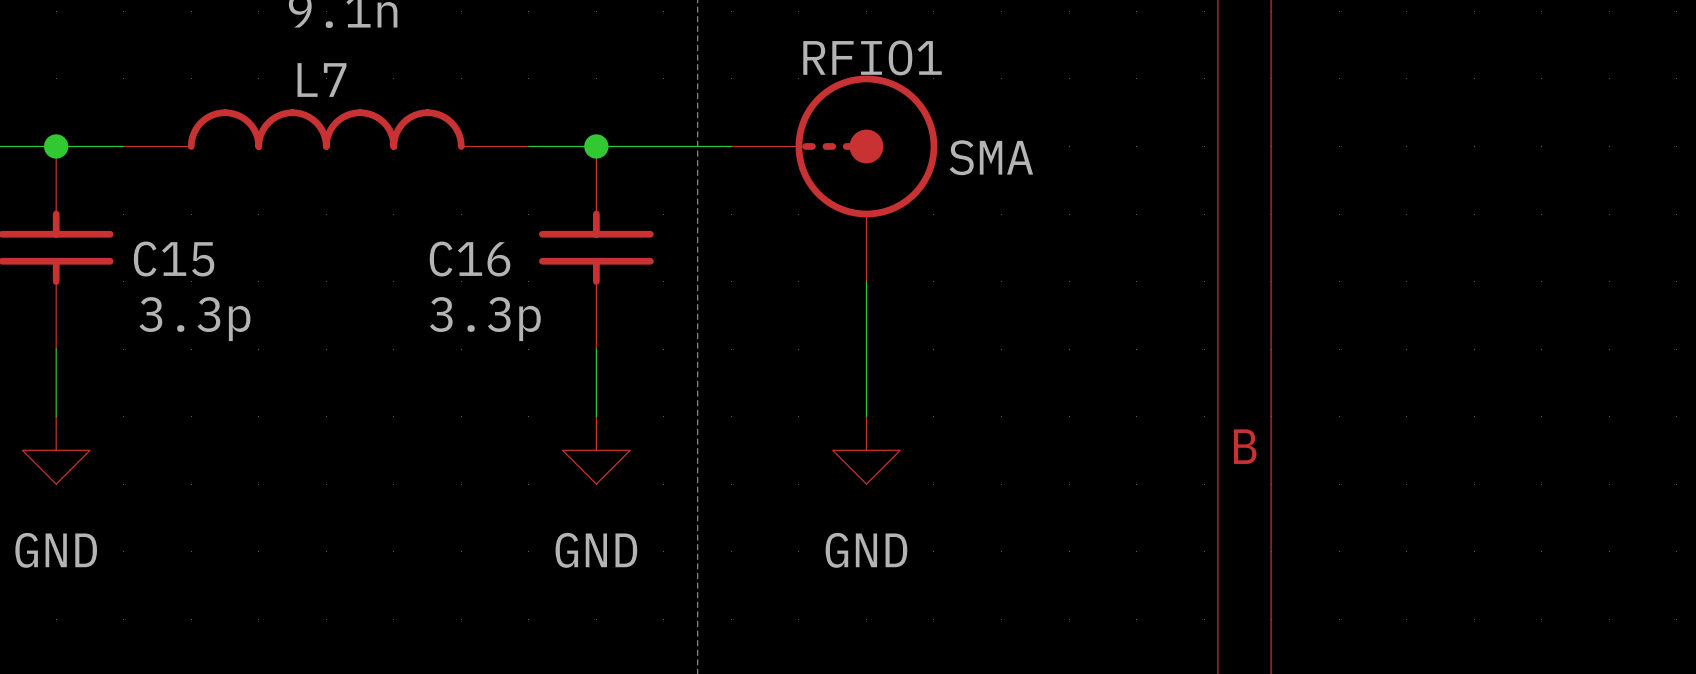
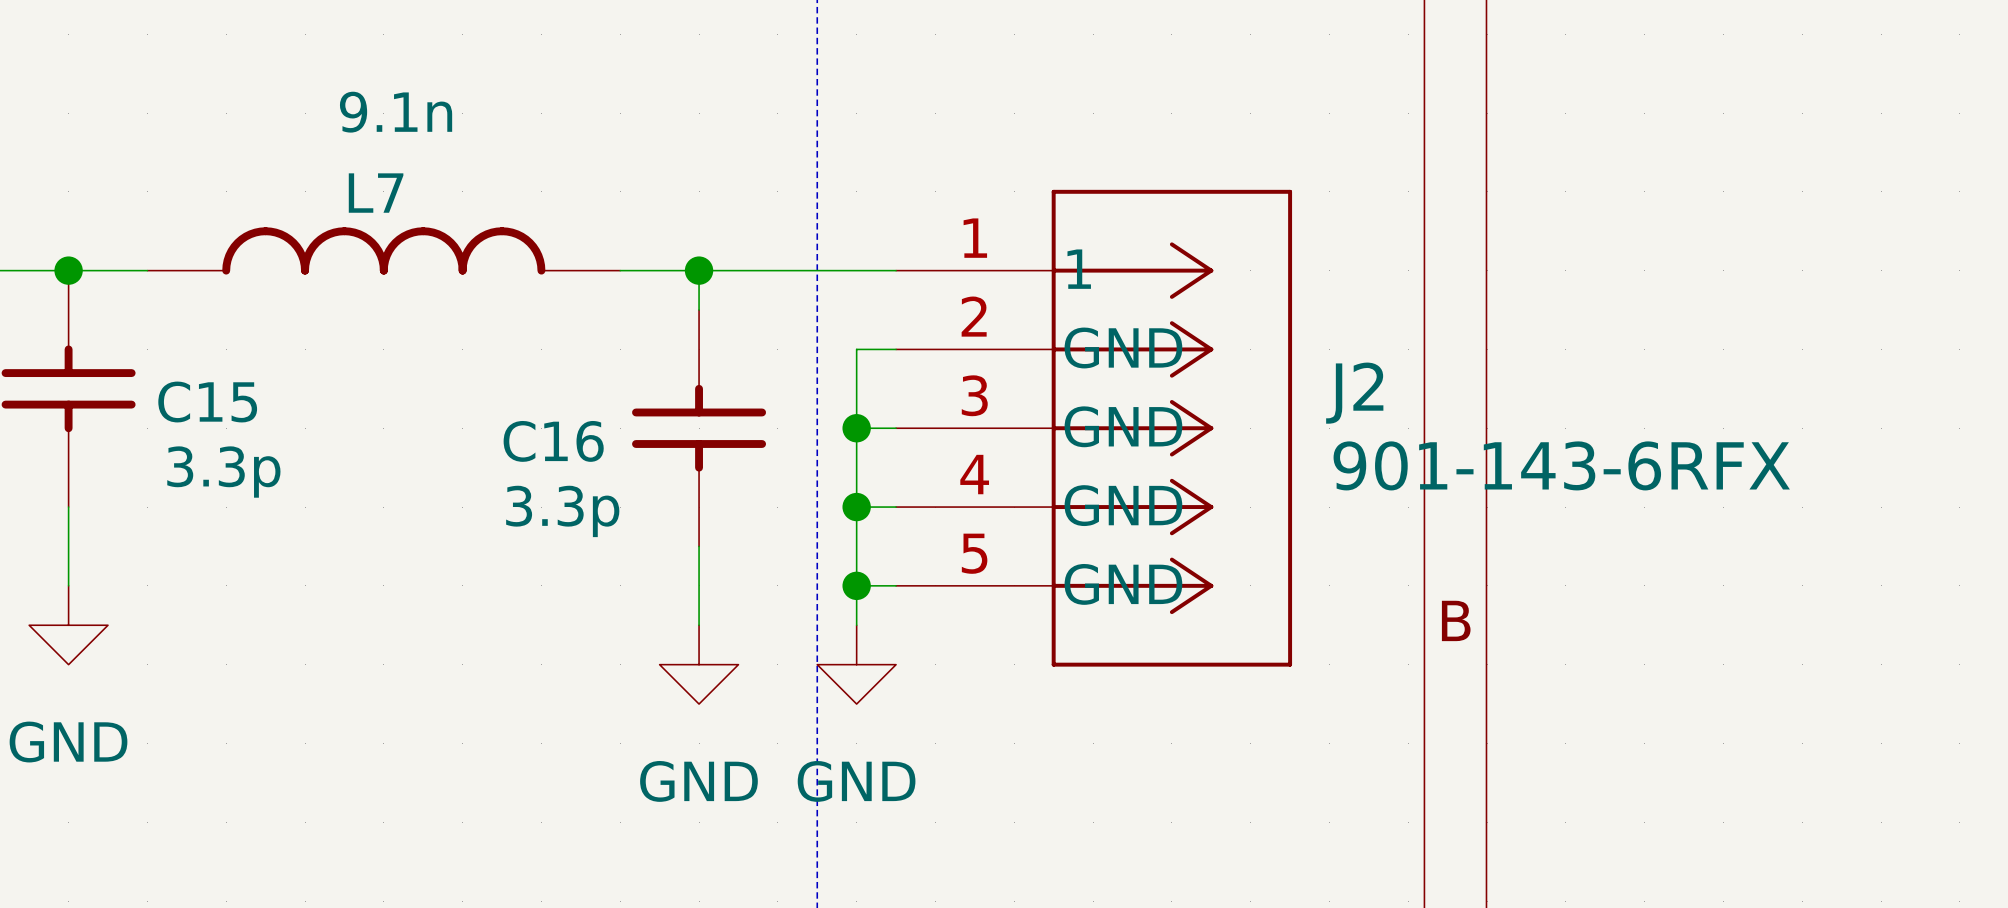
RFIO1: SMA (834, 178) -> none
wire: none -> (896, 349) (856, 349) (856, 625)
C16 position: (596, 247) -> (699, 428)
wire: none -> (856, 428) (896, 428)
junction: none -> (856, 428)
wire: (866, 281) (866, 416) -> none
J2: none -> 901-143-6RFX (1094, 428)
wire: none -> (856, 507) (896, 507)
junction: none -> (856, 507)
wire: none -> (856, 585) (896, 585)
junction: none -> (856, 585)
power symbol position: GND (596, 450) -> GND (699, 664)
power symbol: GND (866, 450) -> none
power symbol: none -> GND (856, 664)

